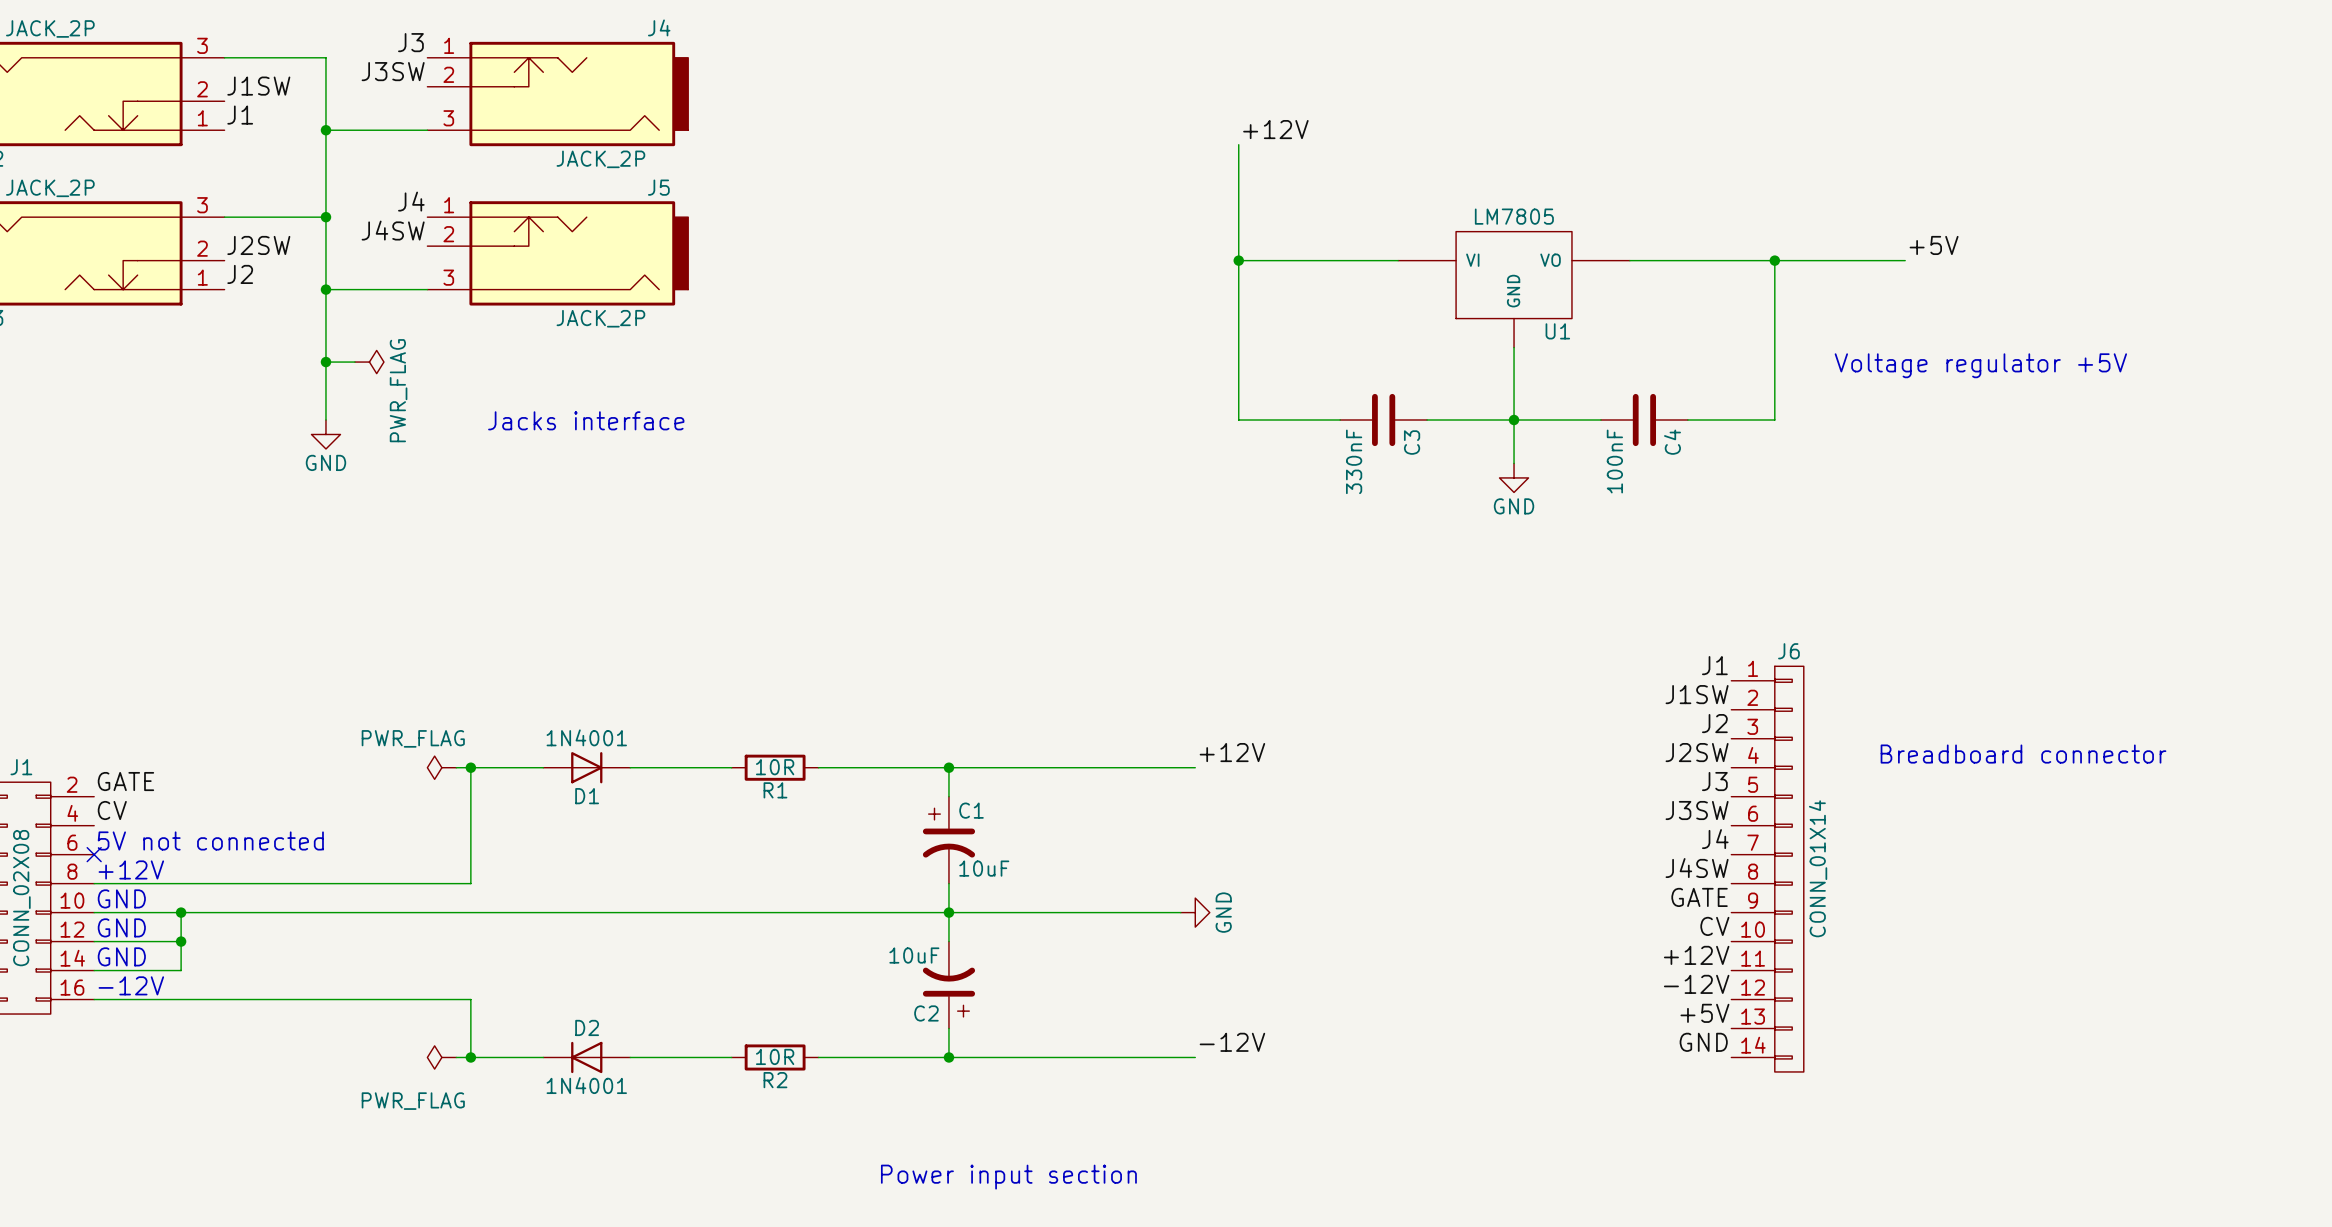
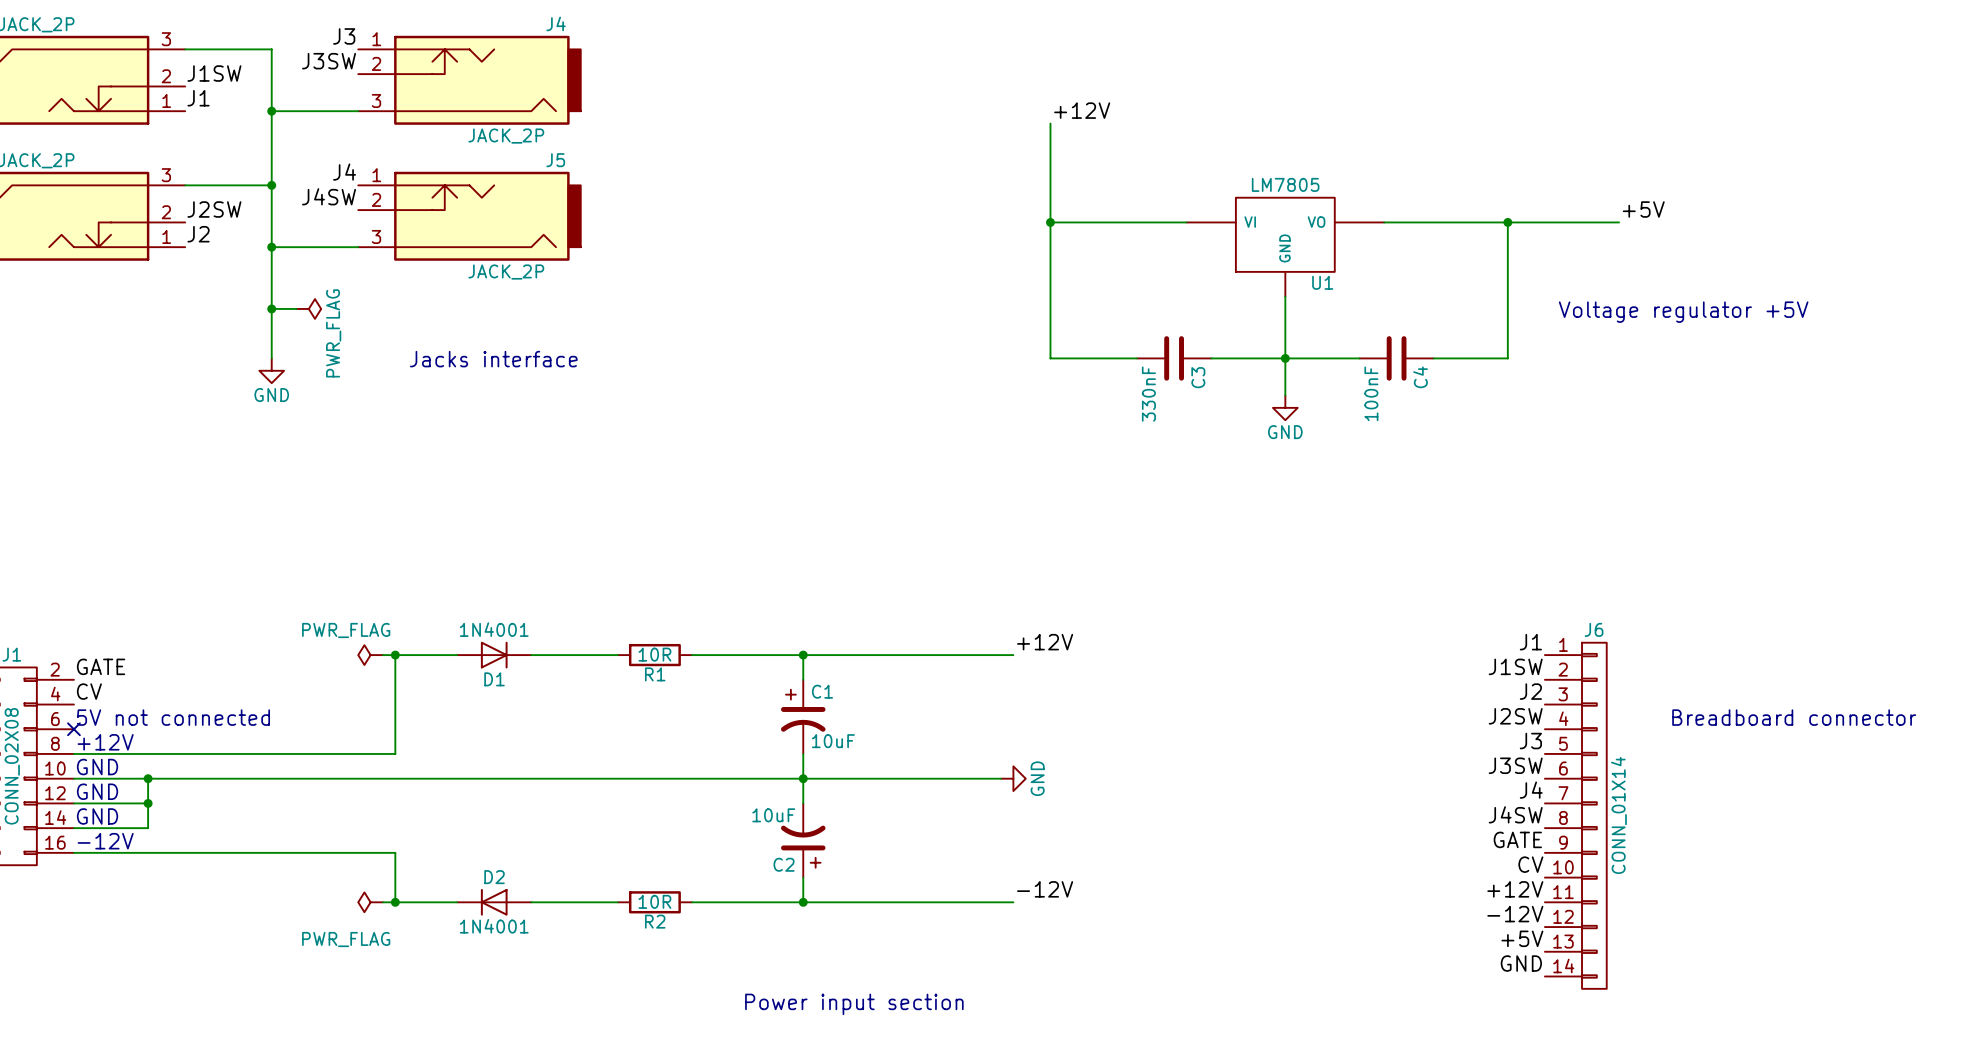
label position: J1 (1714, 665) -> J1 (1530, 642)
label position: J1SW (1697, 694) -> J1SW (1515, 666)
label position: J2 (1714, 723) -> J2 (1530, 691)
label position: J2SW (1697, 752) -> J2SW (1515, 716)
text position: Breadboard connector (2023, 754) -> Breadboard connector (1794, 717)
label position: J3 (1714, 781) -> J3 (1530, 741)
label position: J3SW (1697, 810) -> J3SW (1515, 765)
label position: J4 (1715, 839) -> J4 (1531, 790)
label position: J4SW (1697, 868) -> J4SW (1515, 814)
J6 position: (1767, 869) -> (1575, 815)
label position: GATE (1699, 897) -> GATE (1517, 839)
label position: CV (1714, 926) -> CV (1530, 864)
label position: +12V (1696, 955) -> +12V (1515, 889)
label position: -12V (1696, 984) -> -12V (1515, 914)
label position: +5V (1704, 1013) -> +5V (1522, 938)
label position: GND (1703, 1042) -> GND (1521, 963)

